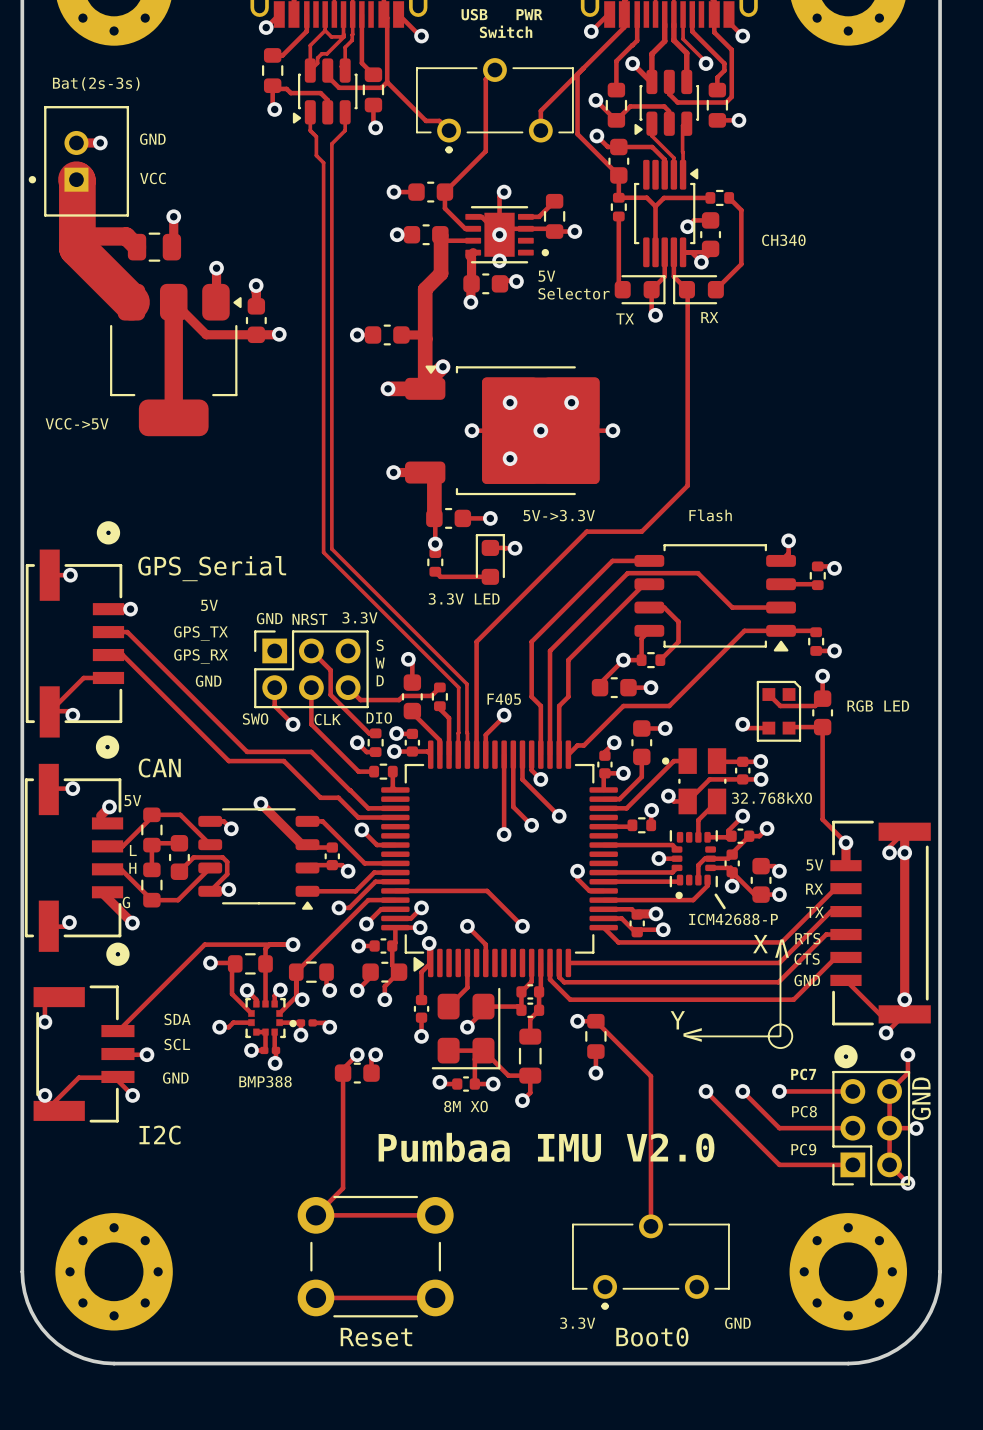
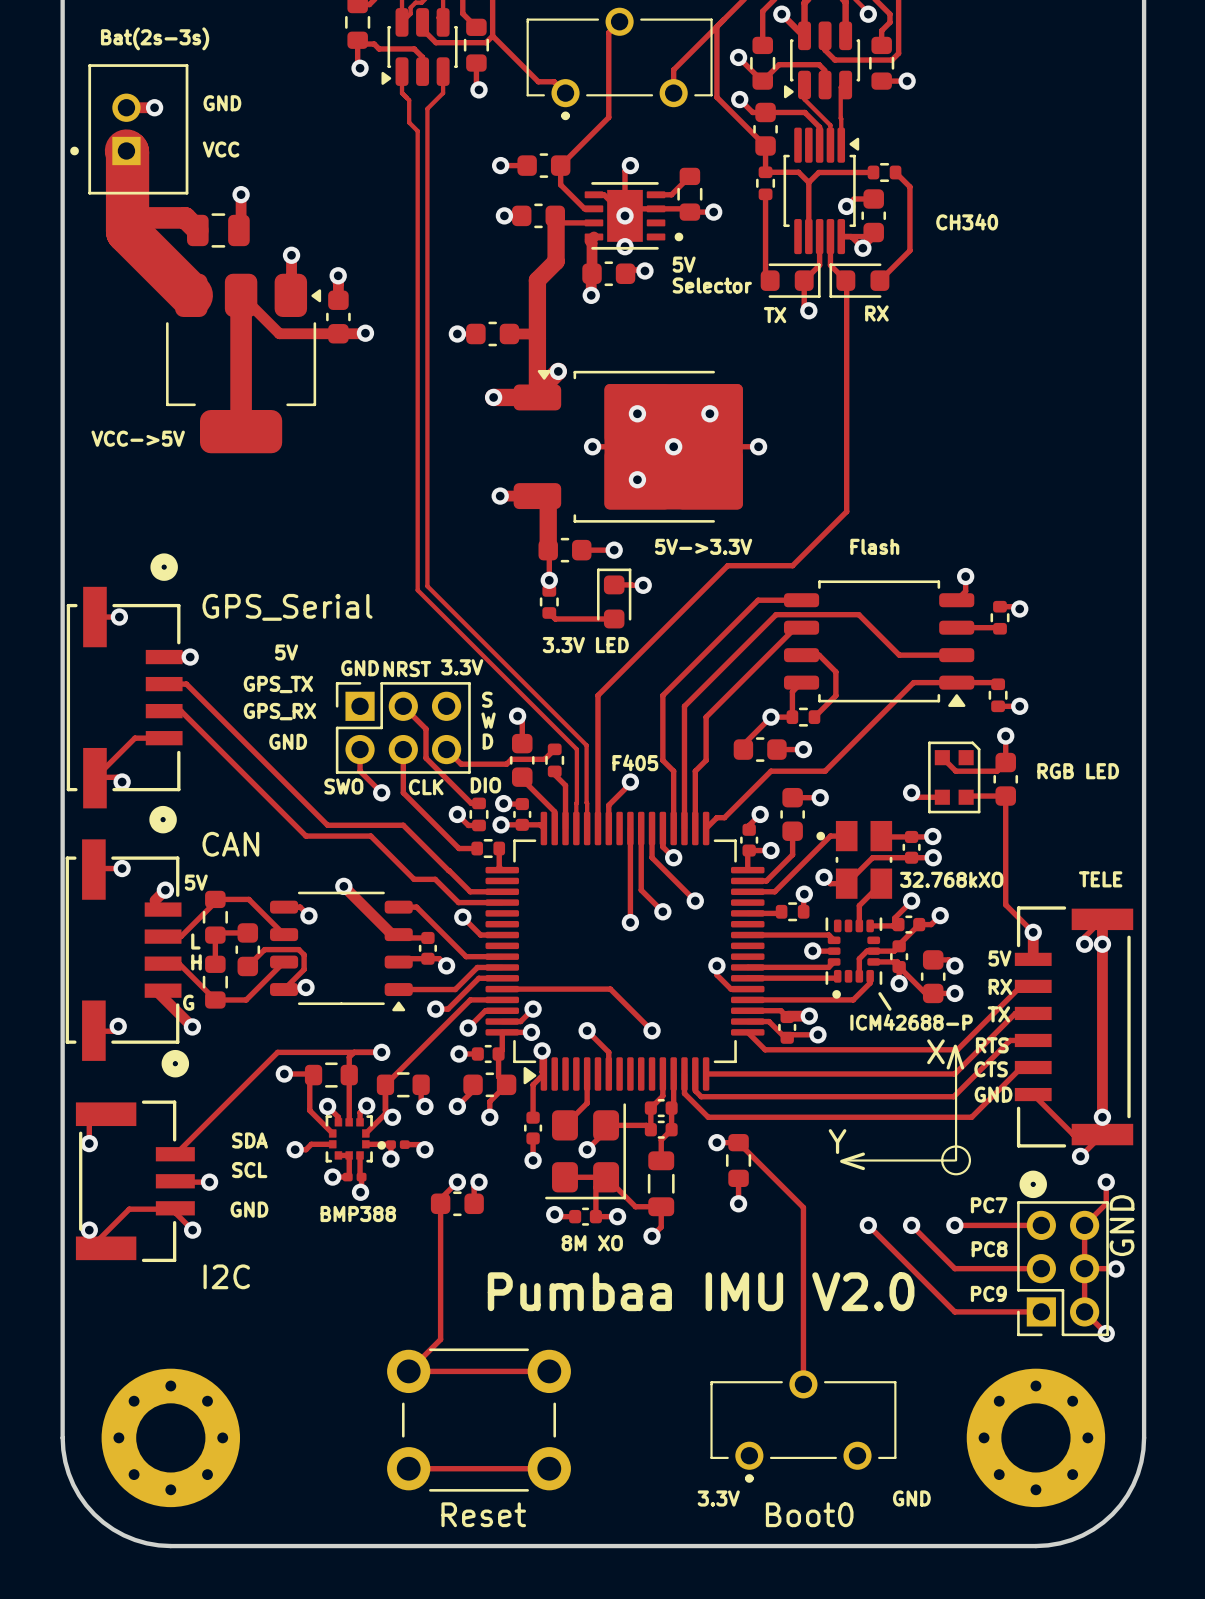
text: none -> TELE (1100, 879)

